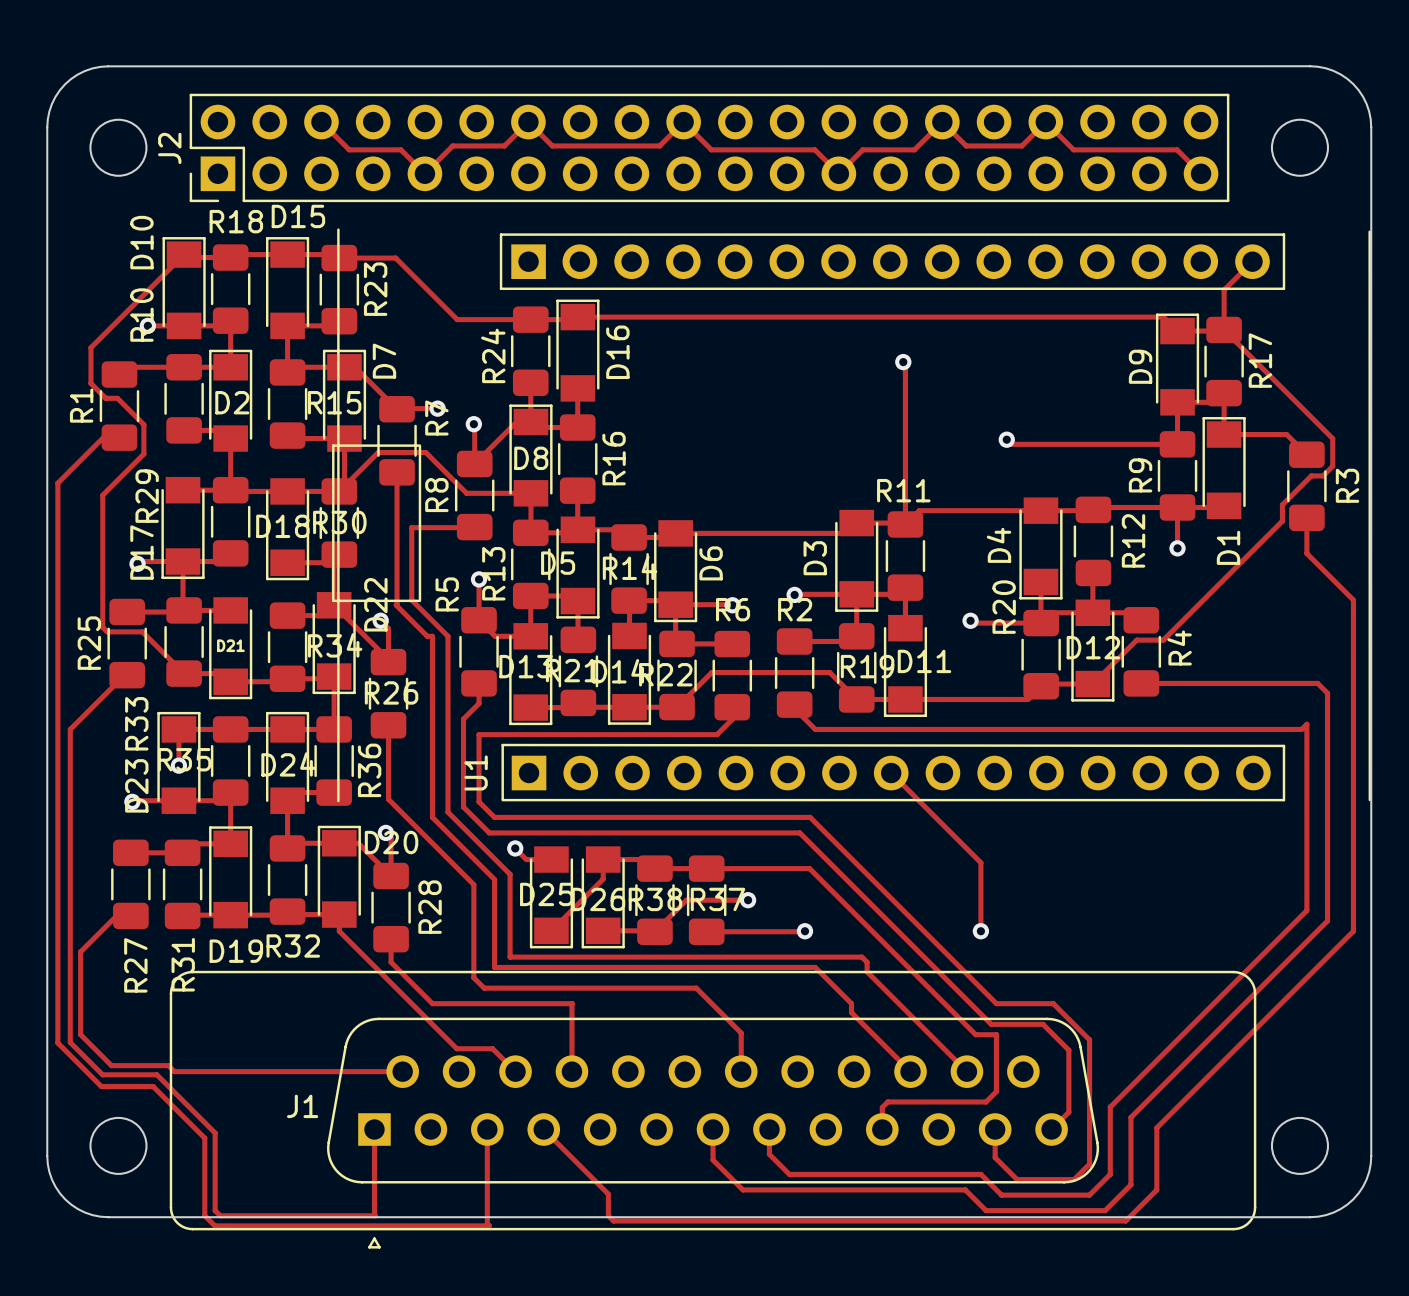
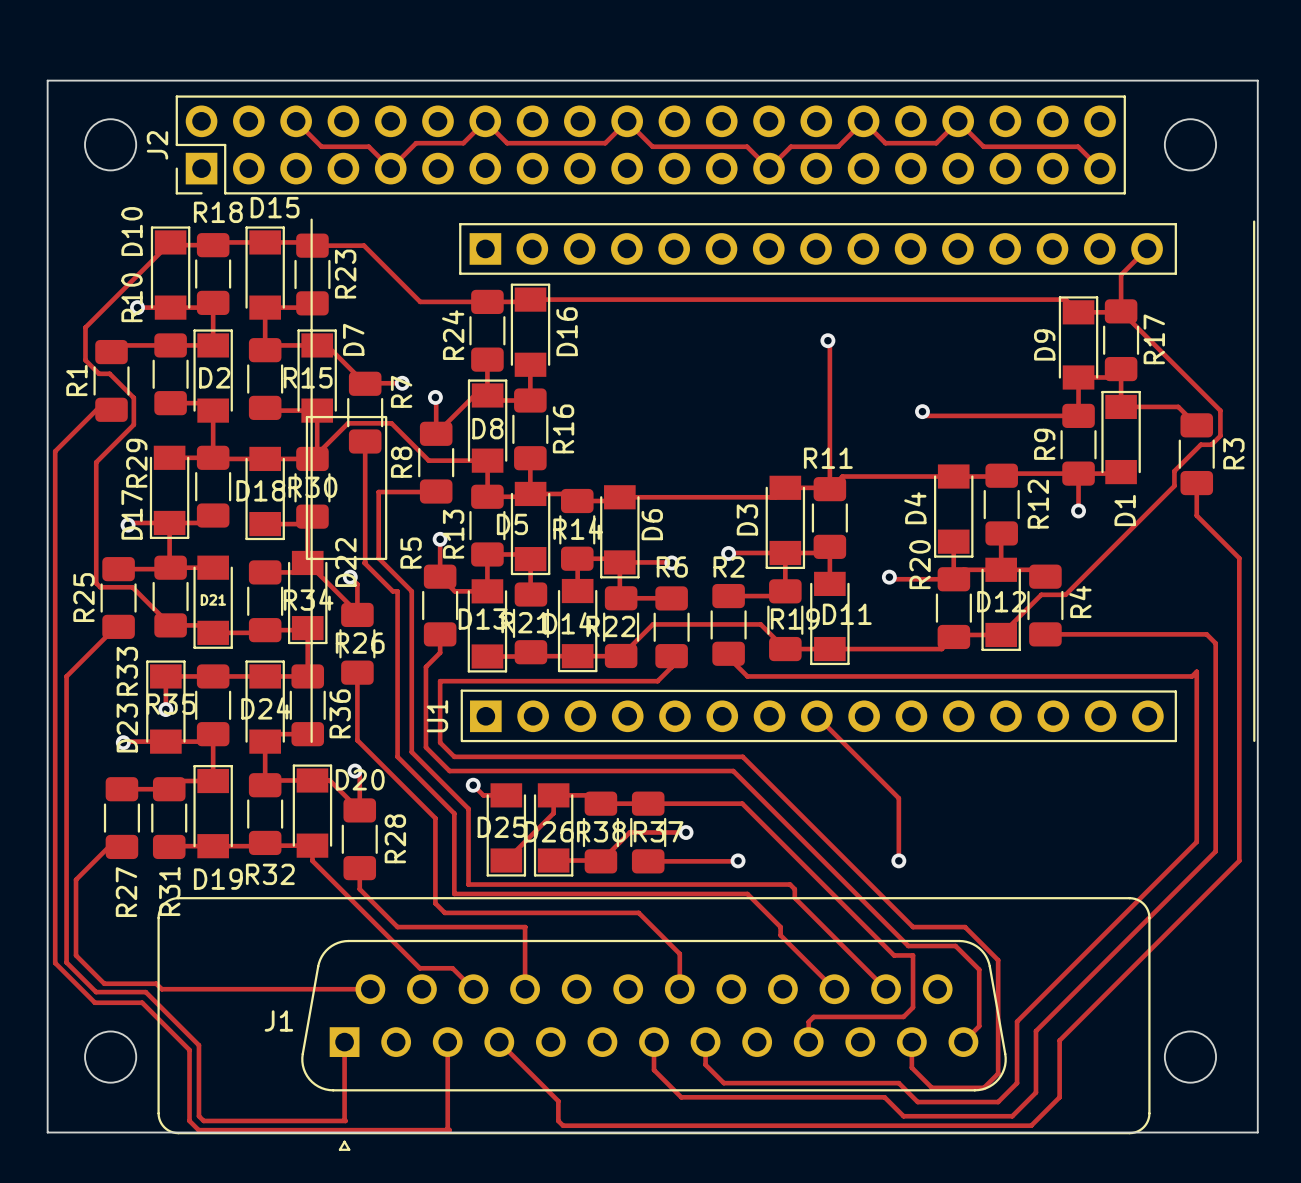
board edge: (108, 66) (1310, 66) (1333, 70) (1353, 84) (1366, 103) (1371, 127) (1371, 1156) (1366, 1179) (1353, 1199) (1333, 1212) (1310, 1217) (108, 1217) (85, 1212) (65, 1199) (51, 1179) (47, 1156) (47, 127) (51, 104) (65, 84) (84, 71) (108, 66) -> (47, 80) (47, 1132) (1257, 1132) (1257, 80) (47, 80)

